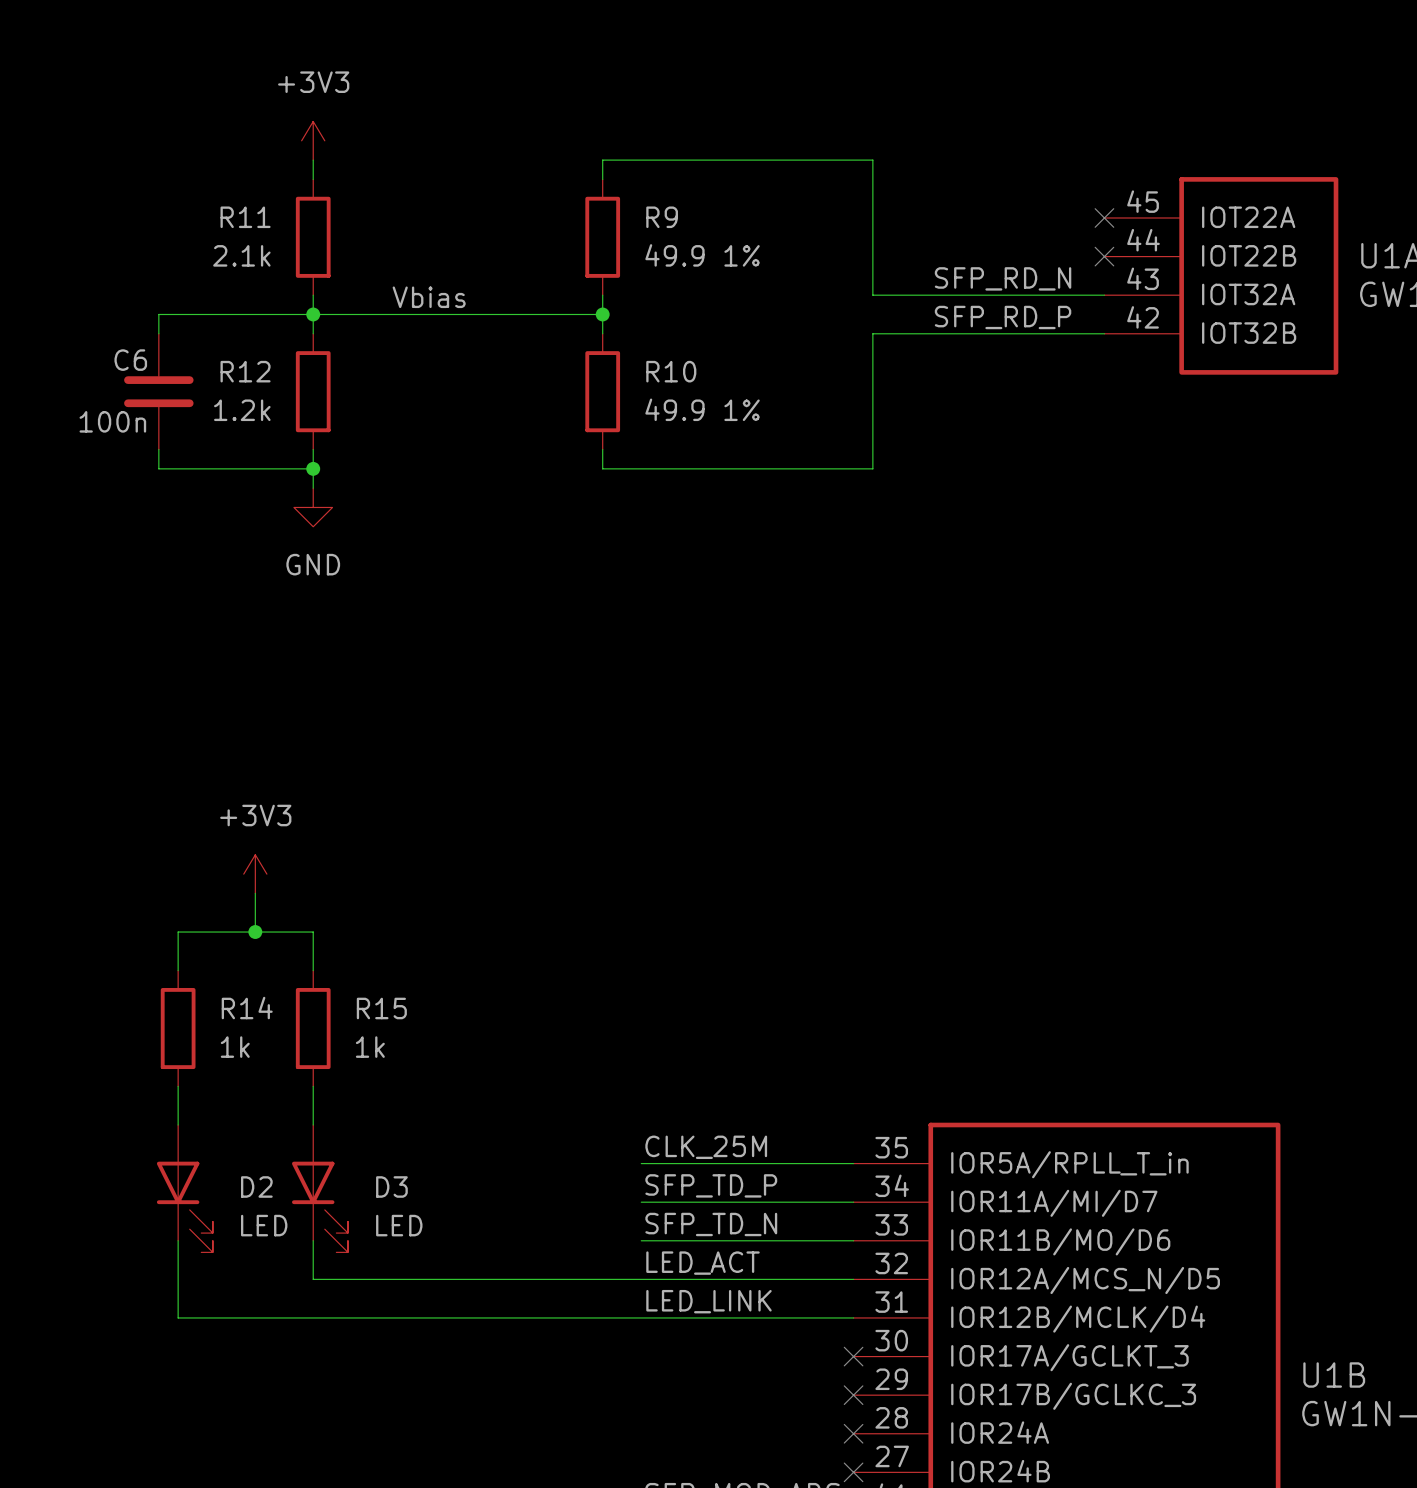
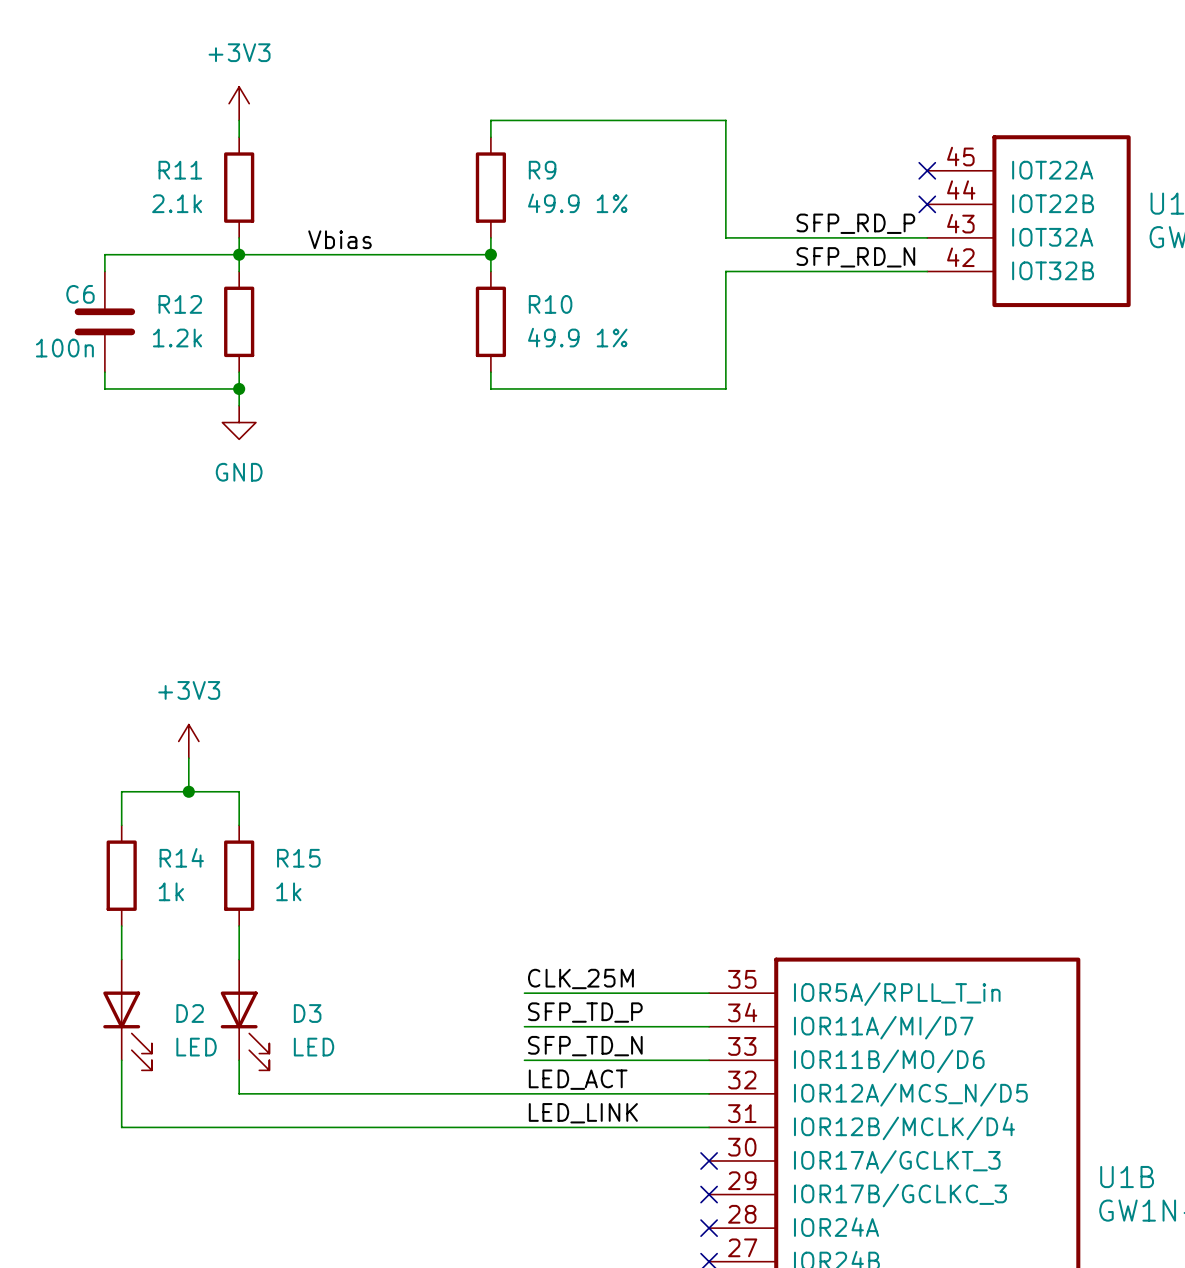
label position: SFP_RD_N (1003, 278) -> SFP_RD_N (855, 257)
label position: SFP_RD_P (1003, 317) -> SFP_RD_P (855, 223)

